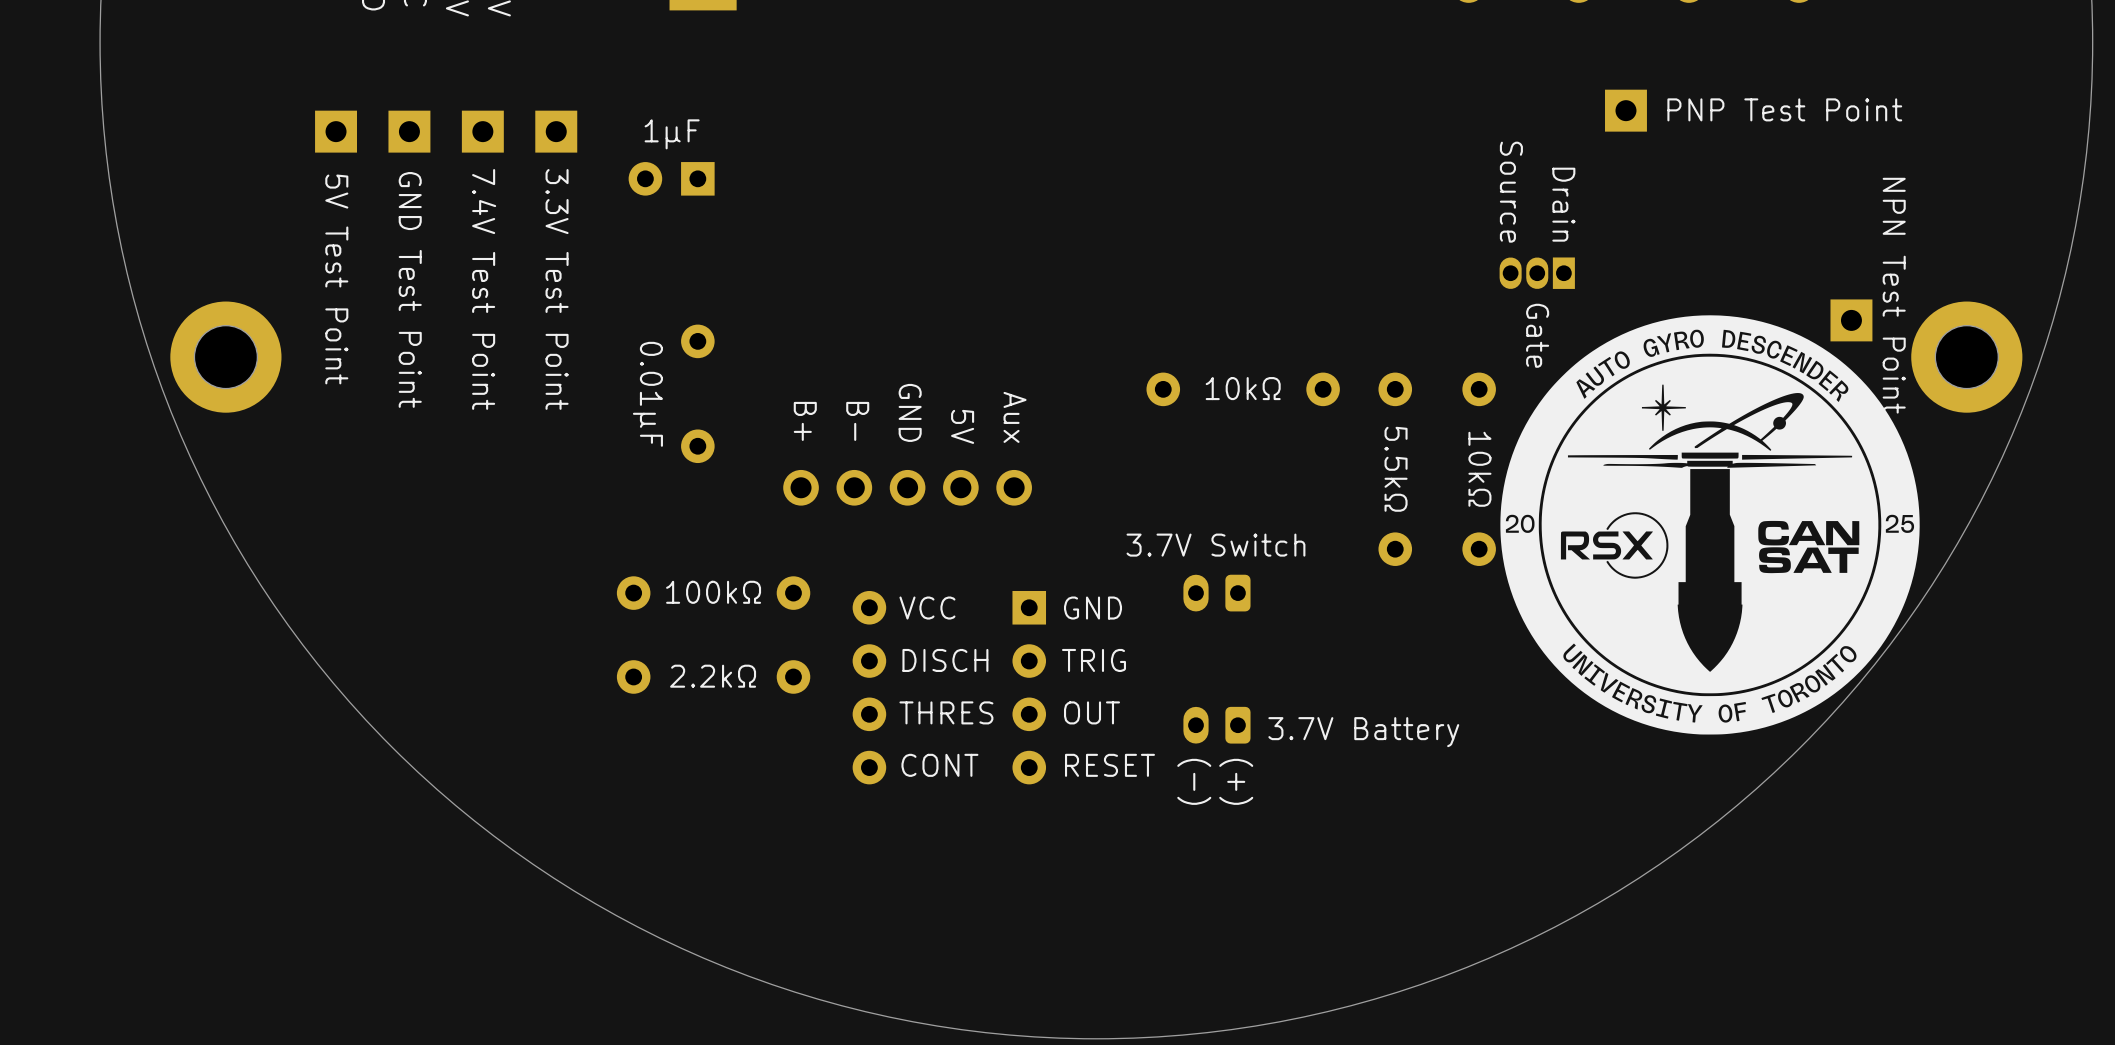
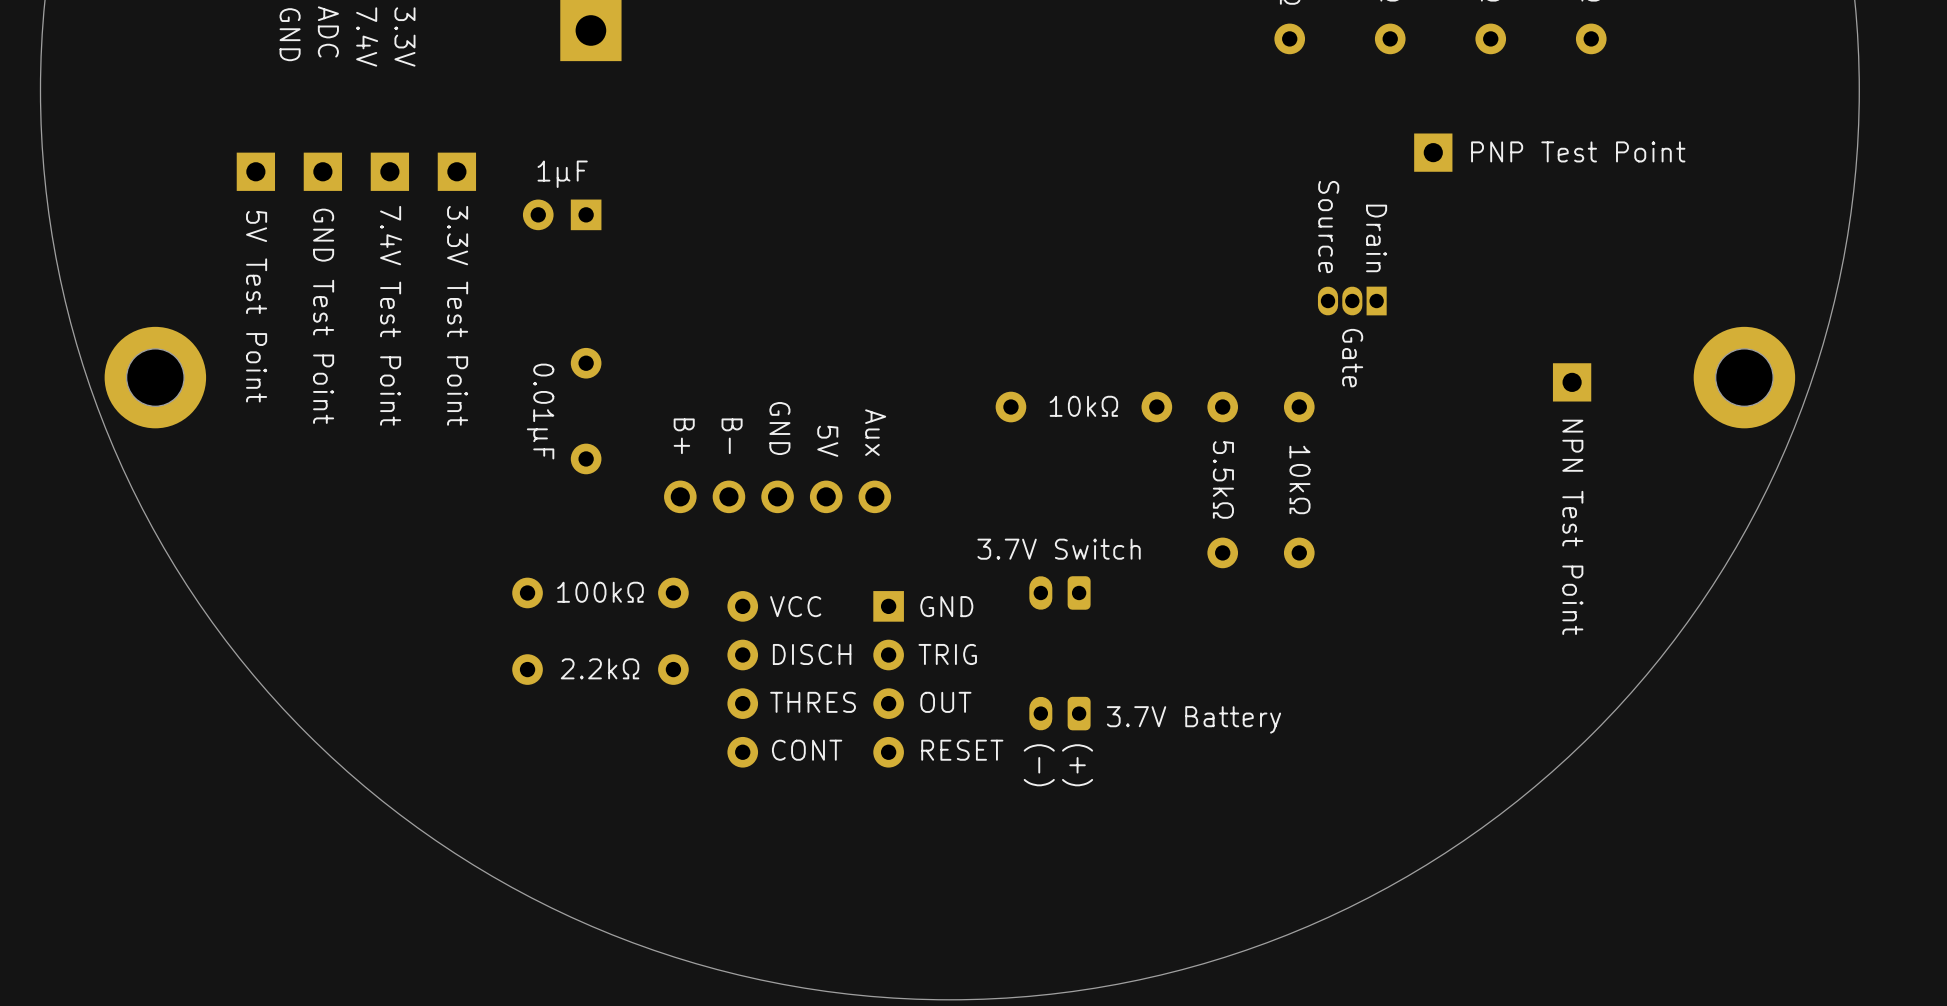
text position: NPN Test Point (1894, 295) -> NPN Test Point (1572, 527)
drawing: [1500, 315, 1920, 735] -> none
part position: (1851, 320) -> (1572, 382)

